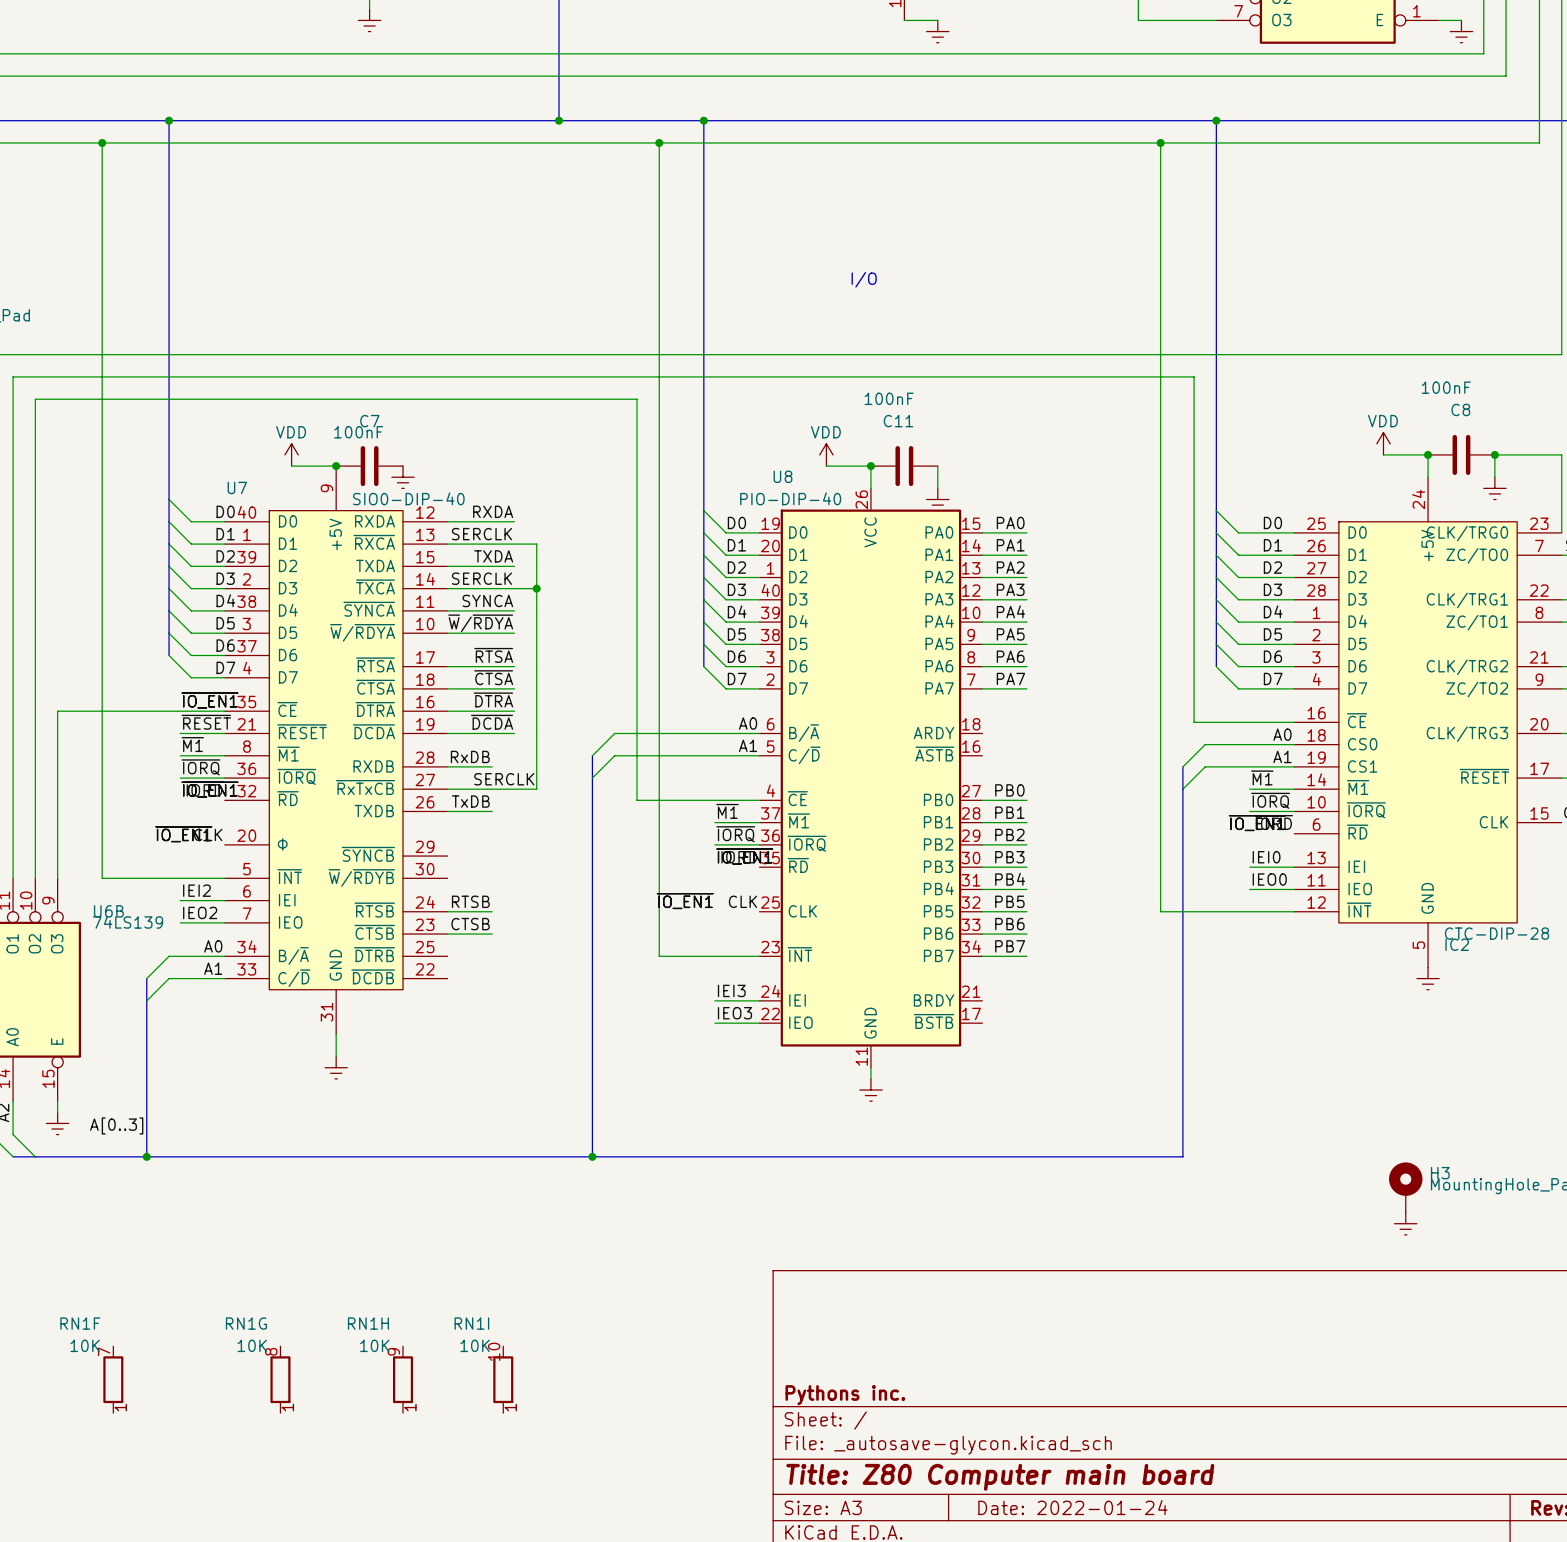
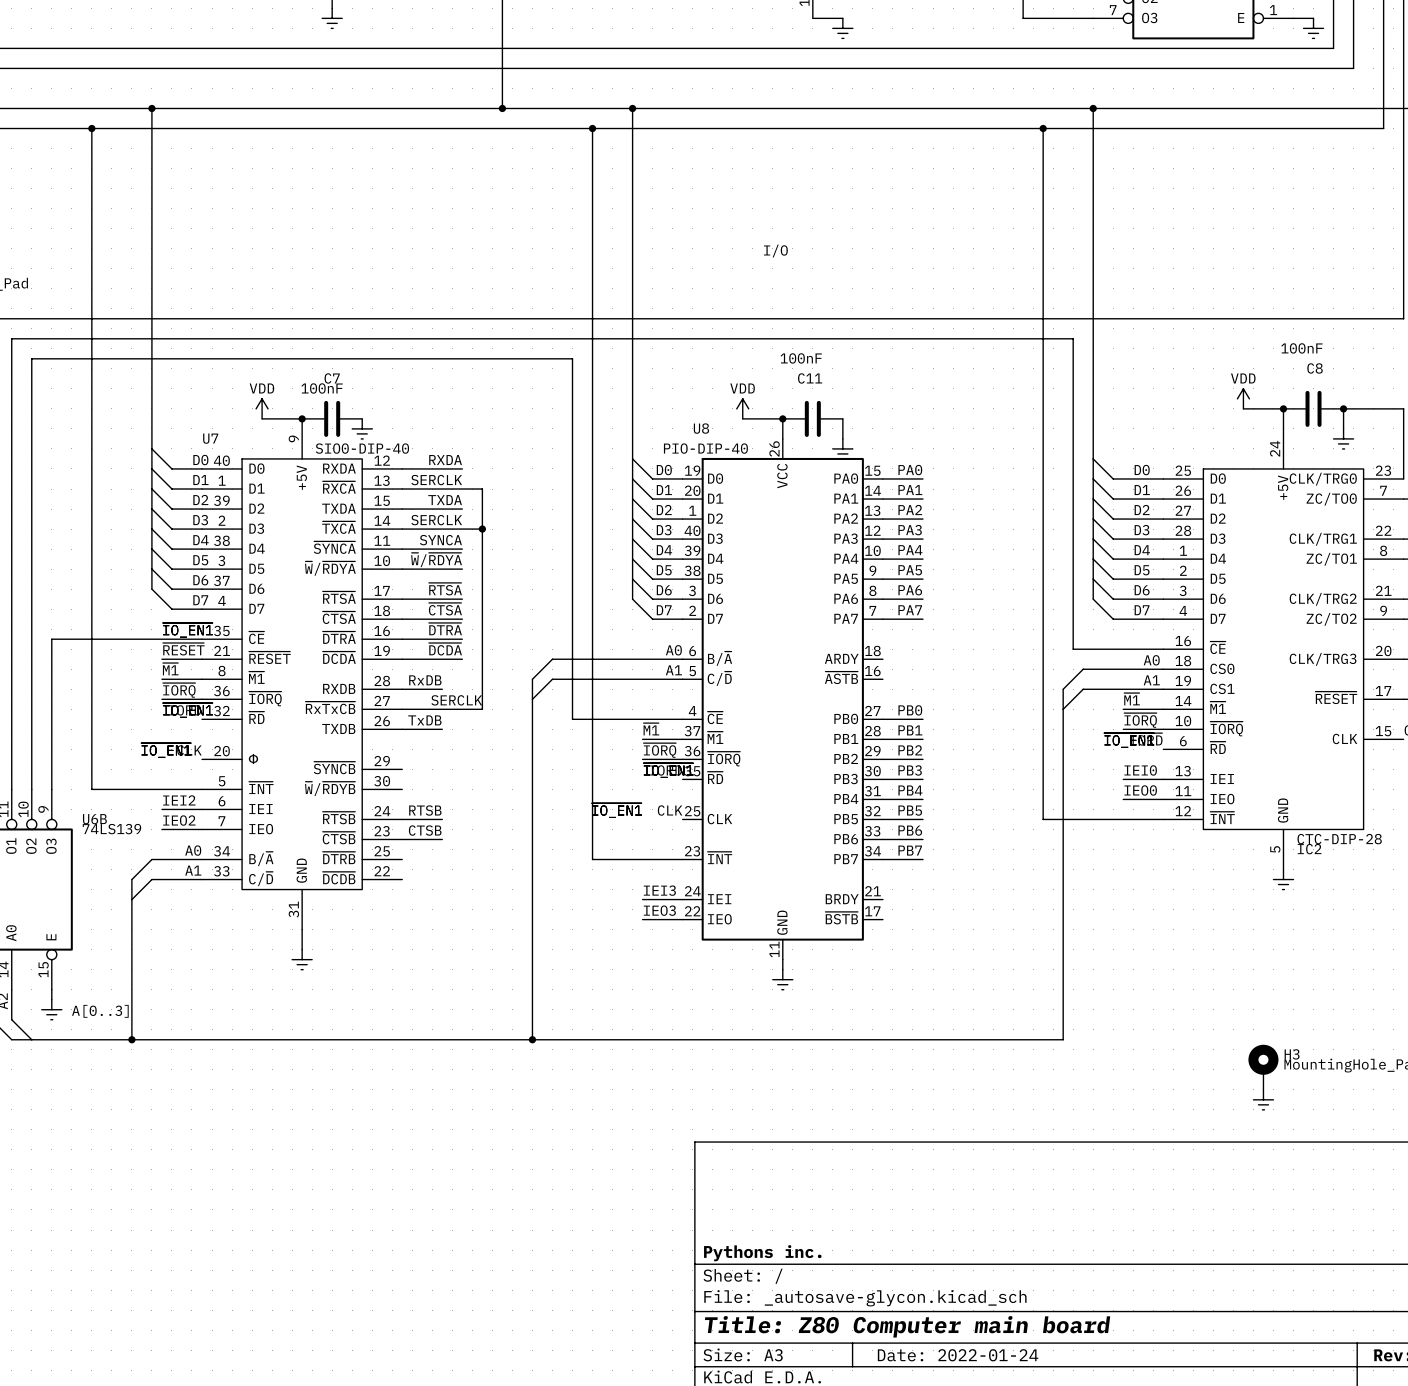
RN1F: 10K (113, 1379) -> none
RN1G: 10K (280, 1379) -> none
RN1H: 10K (403, 1379) -> none
RN1I: 10K (503, 1379) -> none

